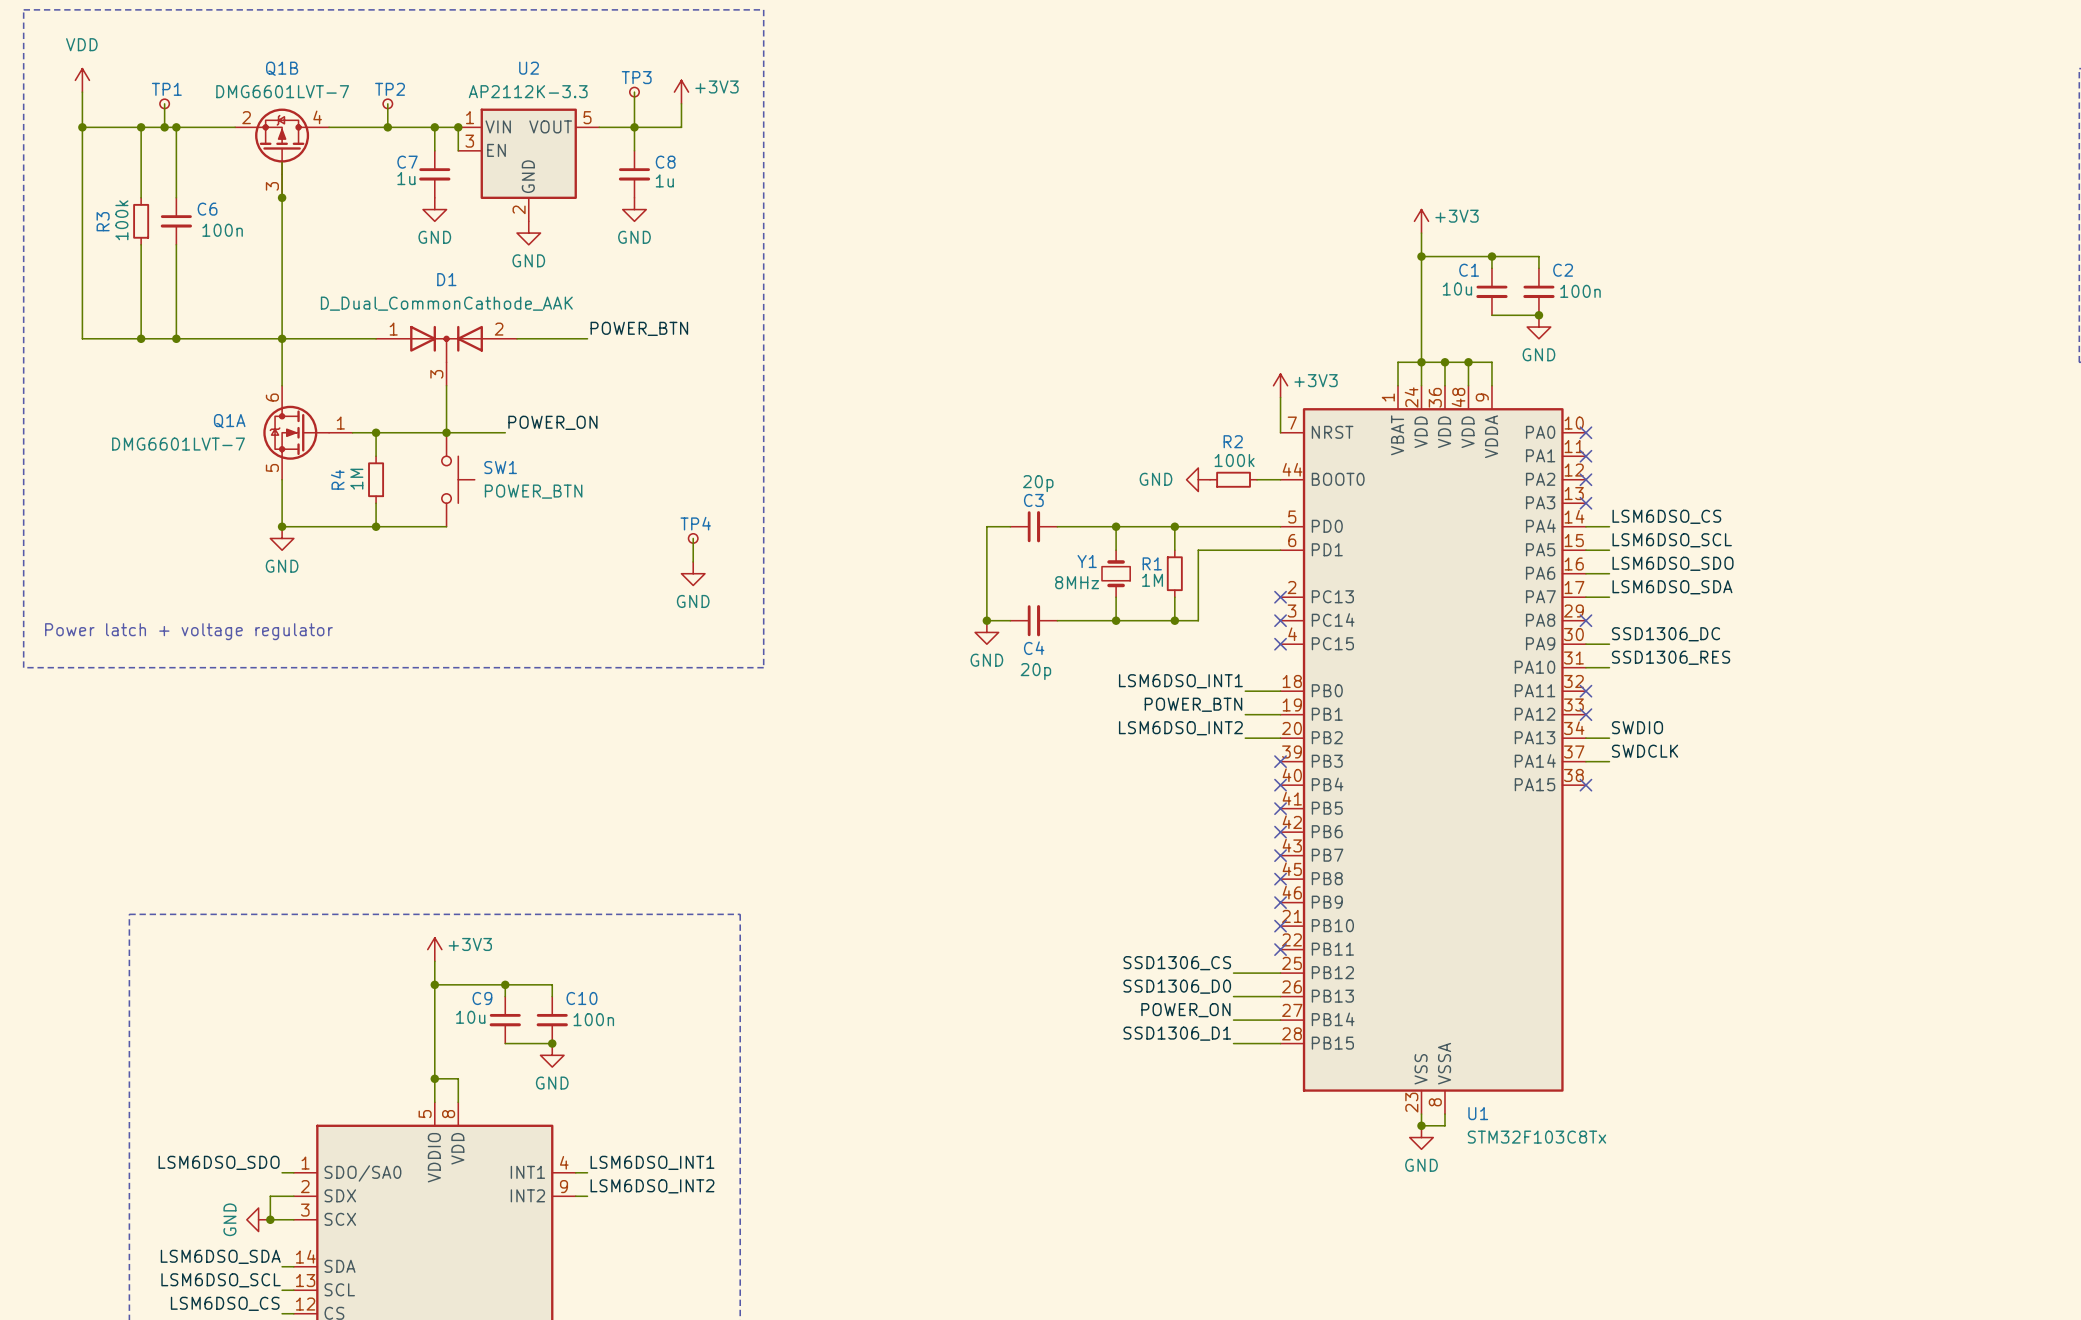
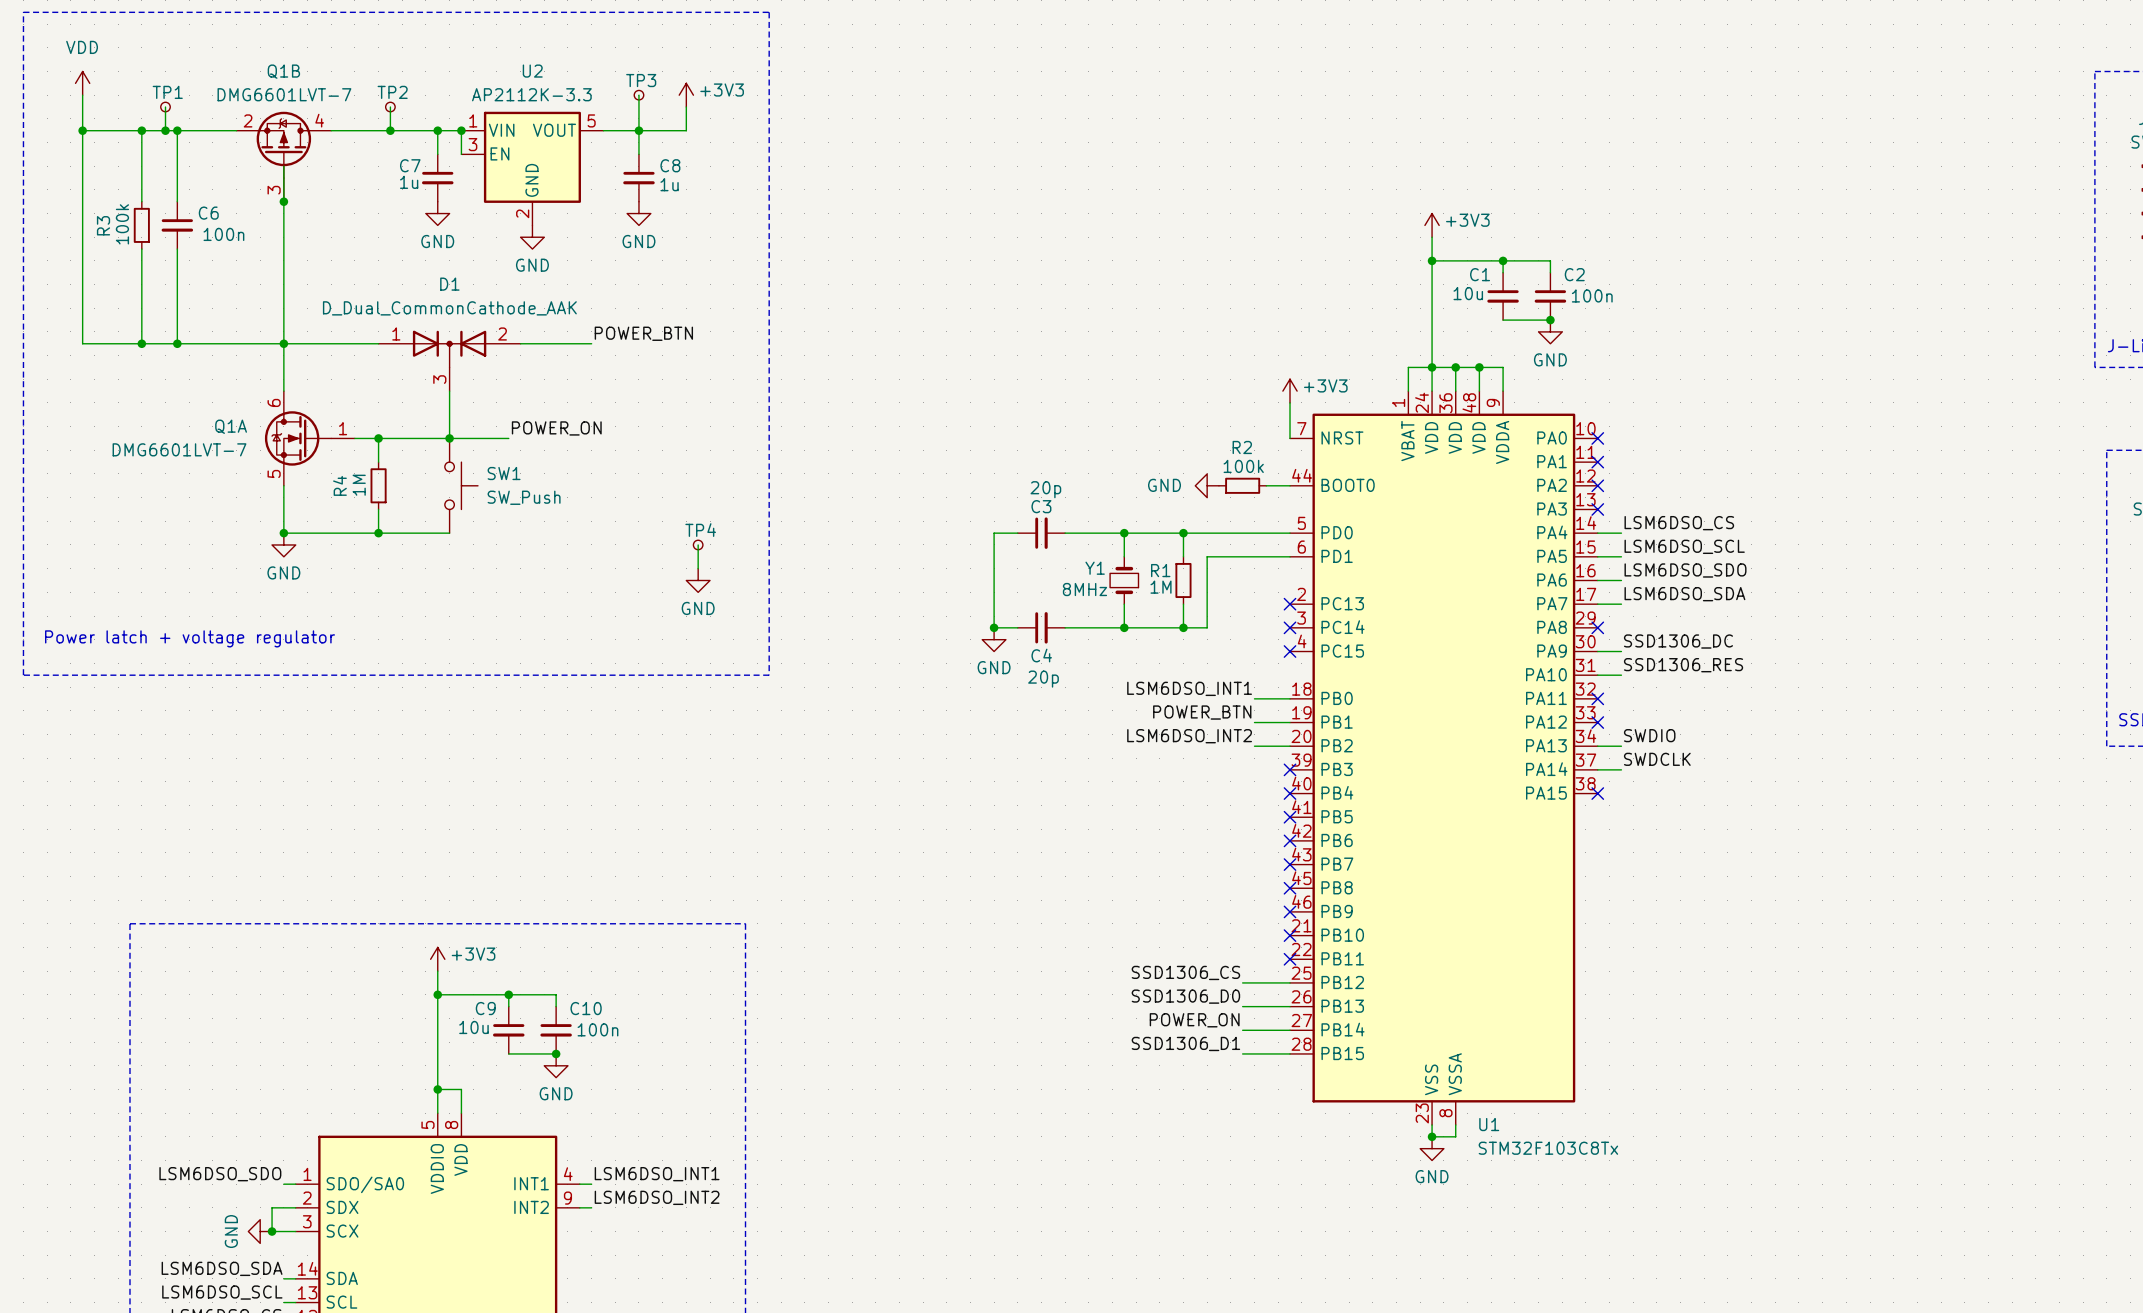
SW1 value: POWER_BTN (533, 491) -> SW_Push (524, 497)

